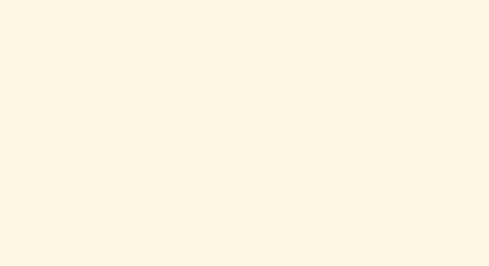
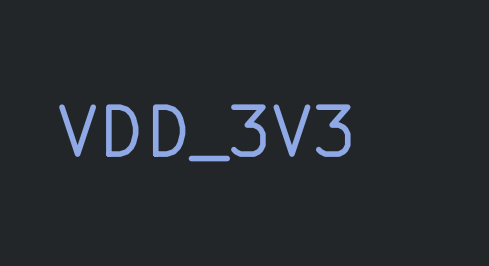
text: none -> VDD_3V3 (204, 132)

